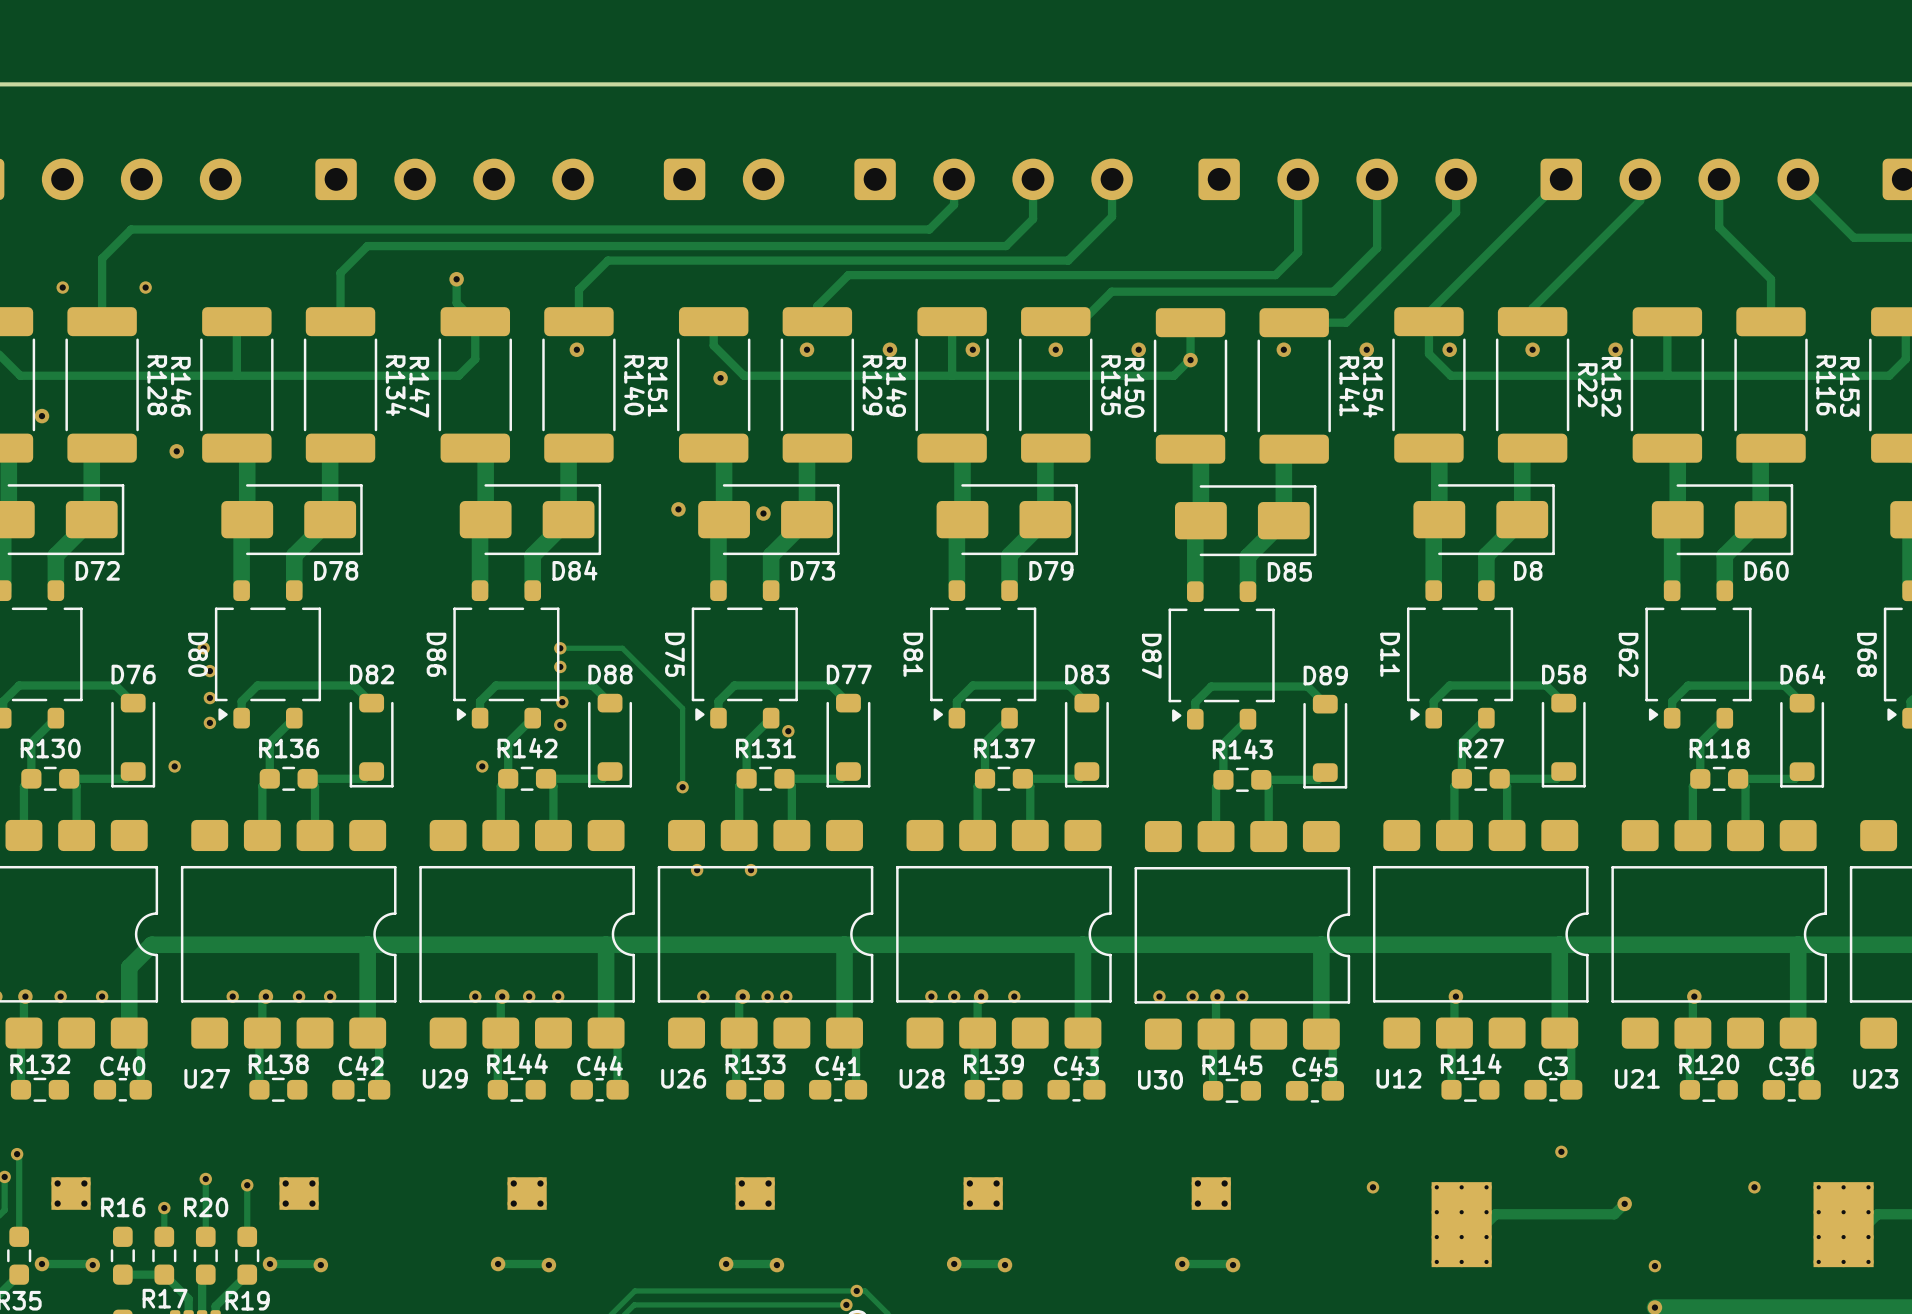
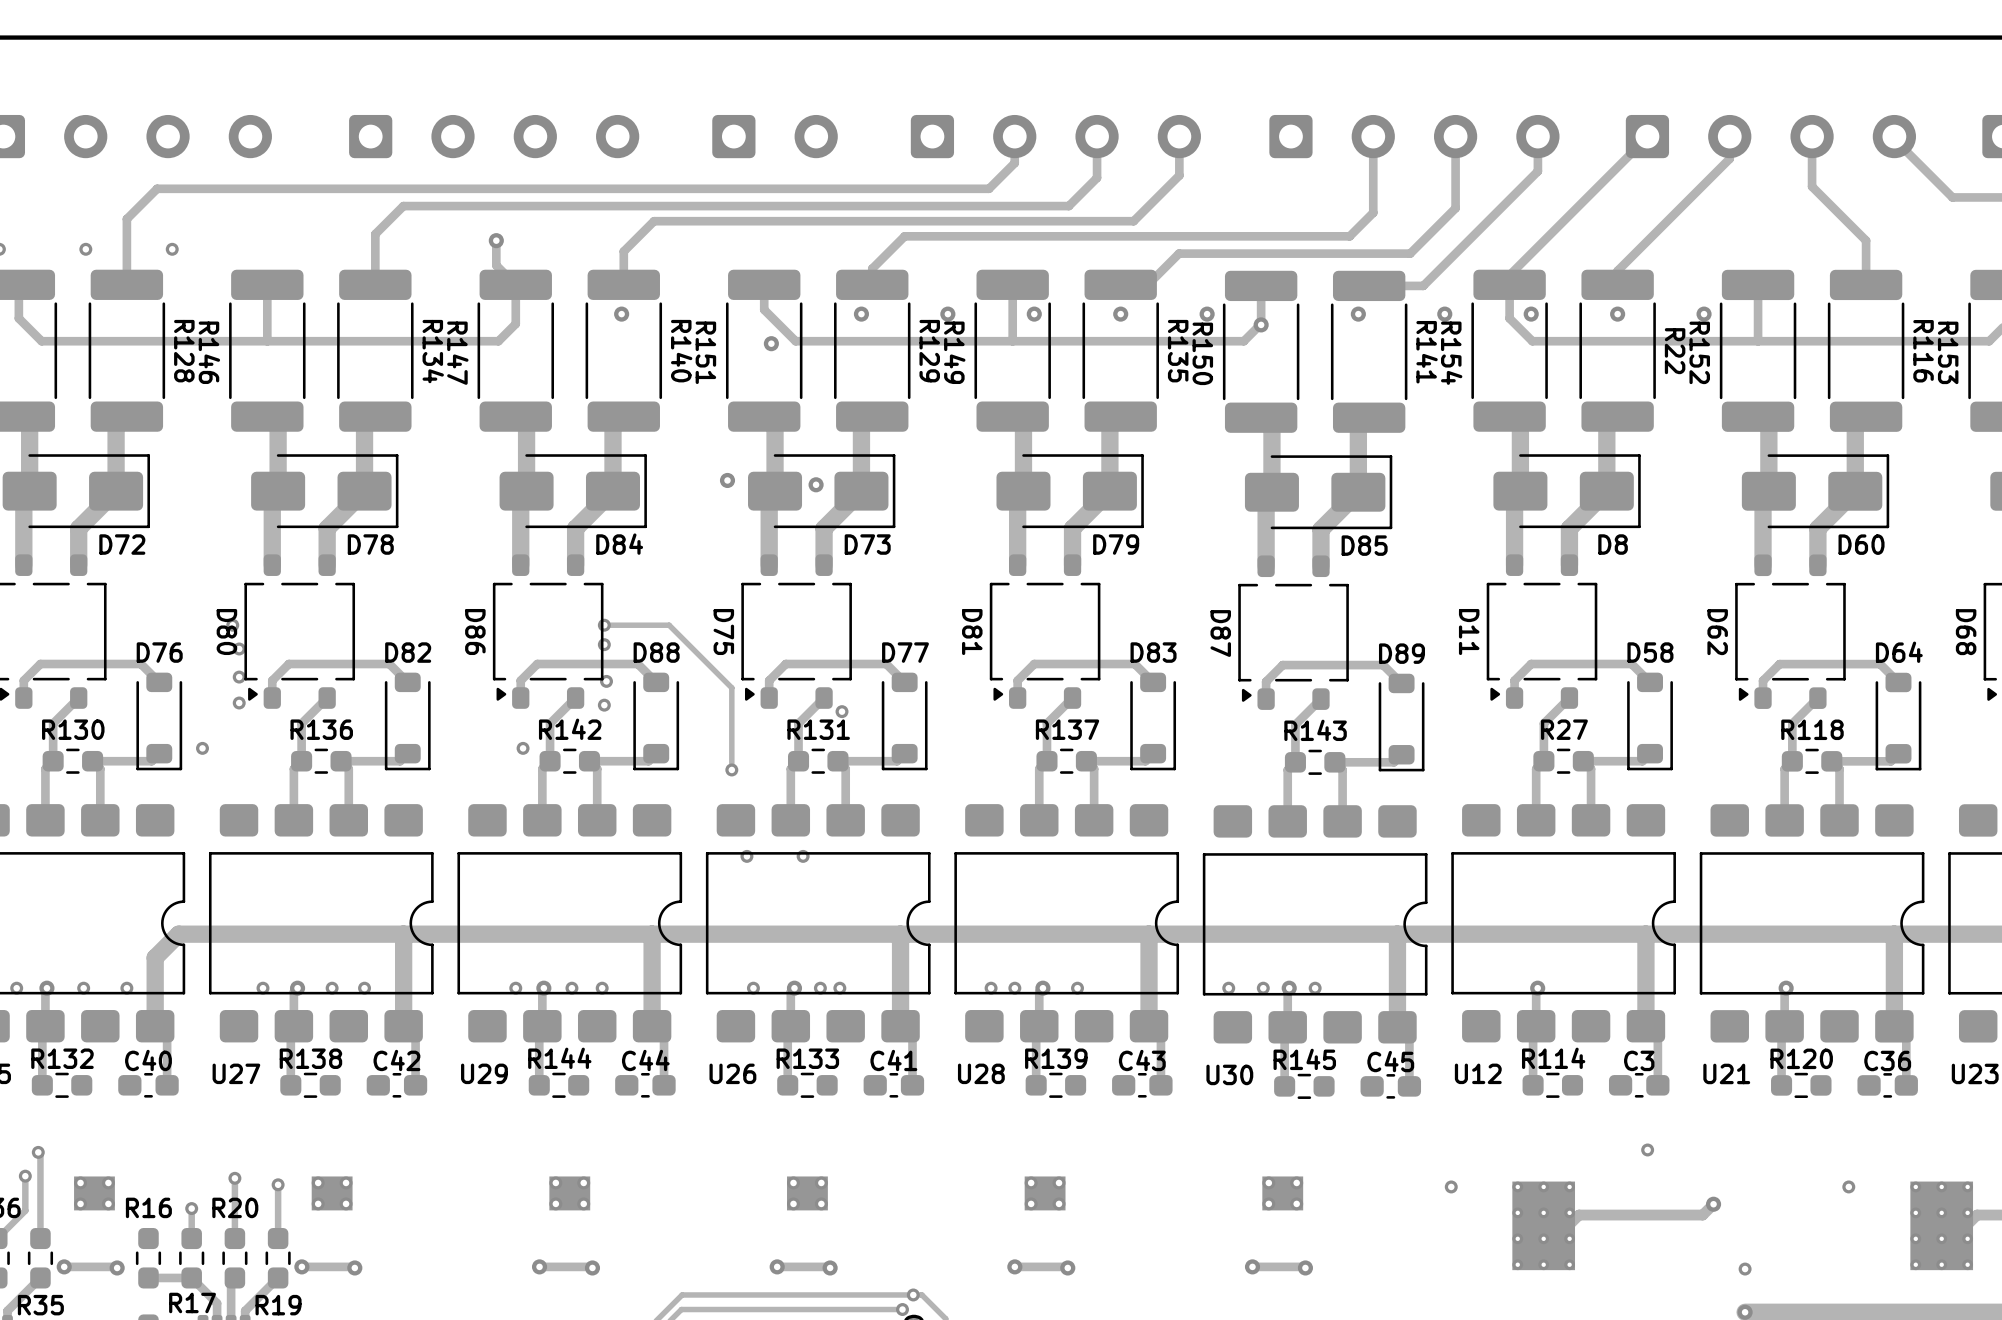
via: (41, 416) -> none
via: (176, 451) -> none

